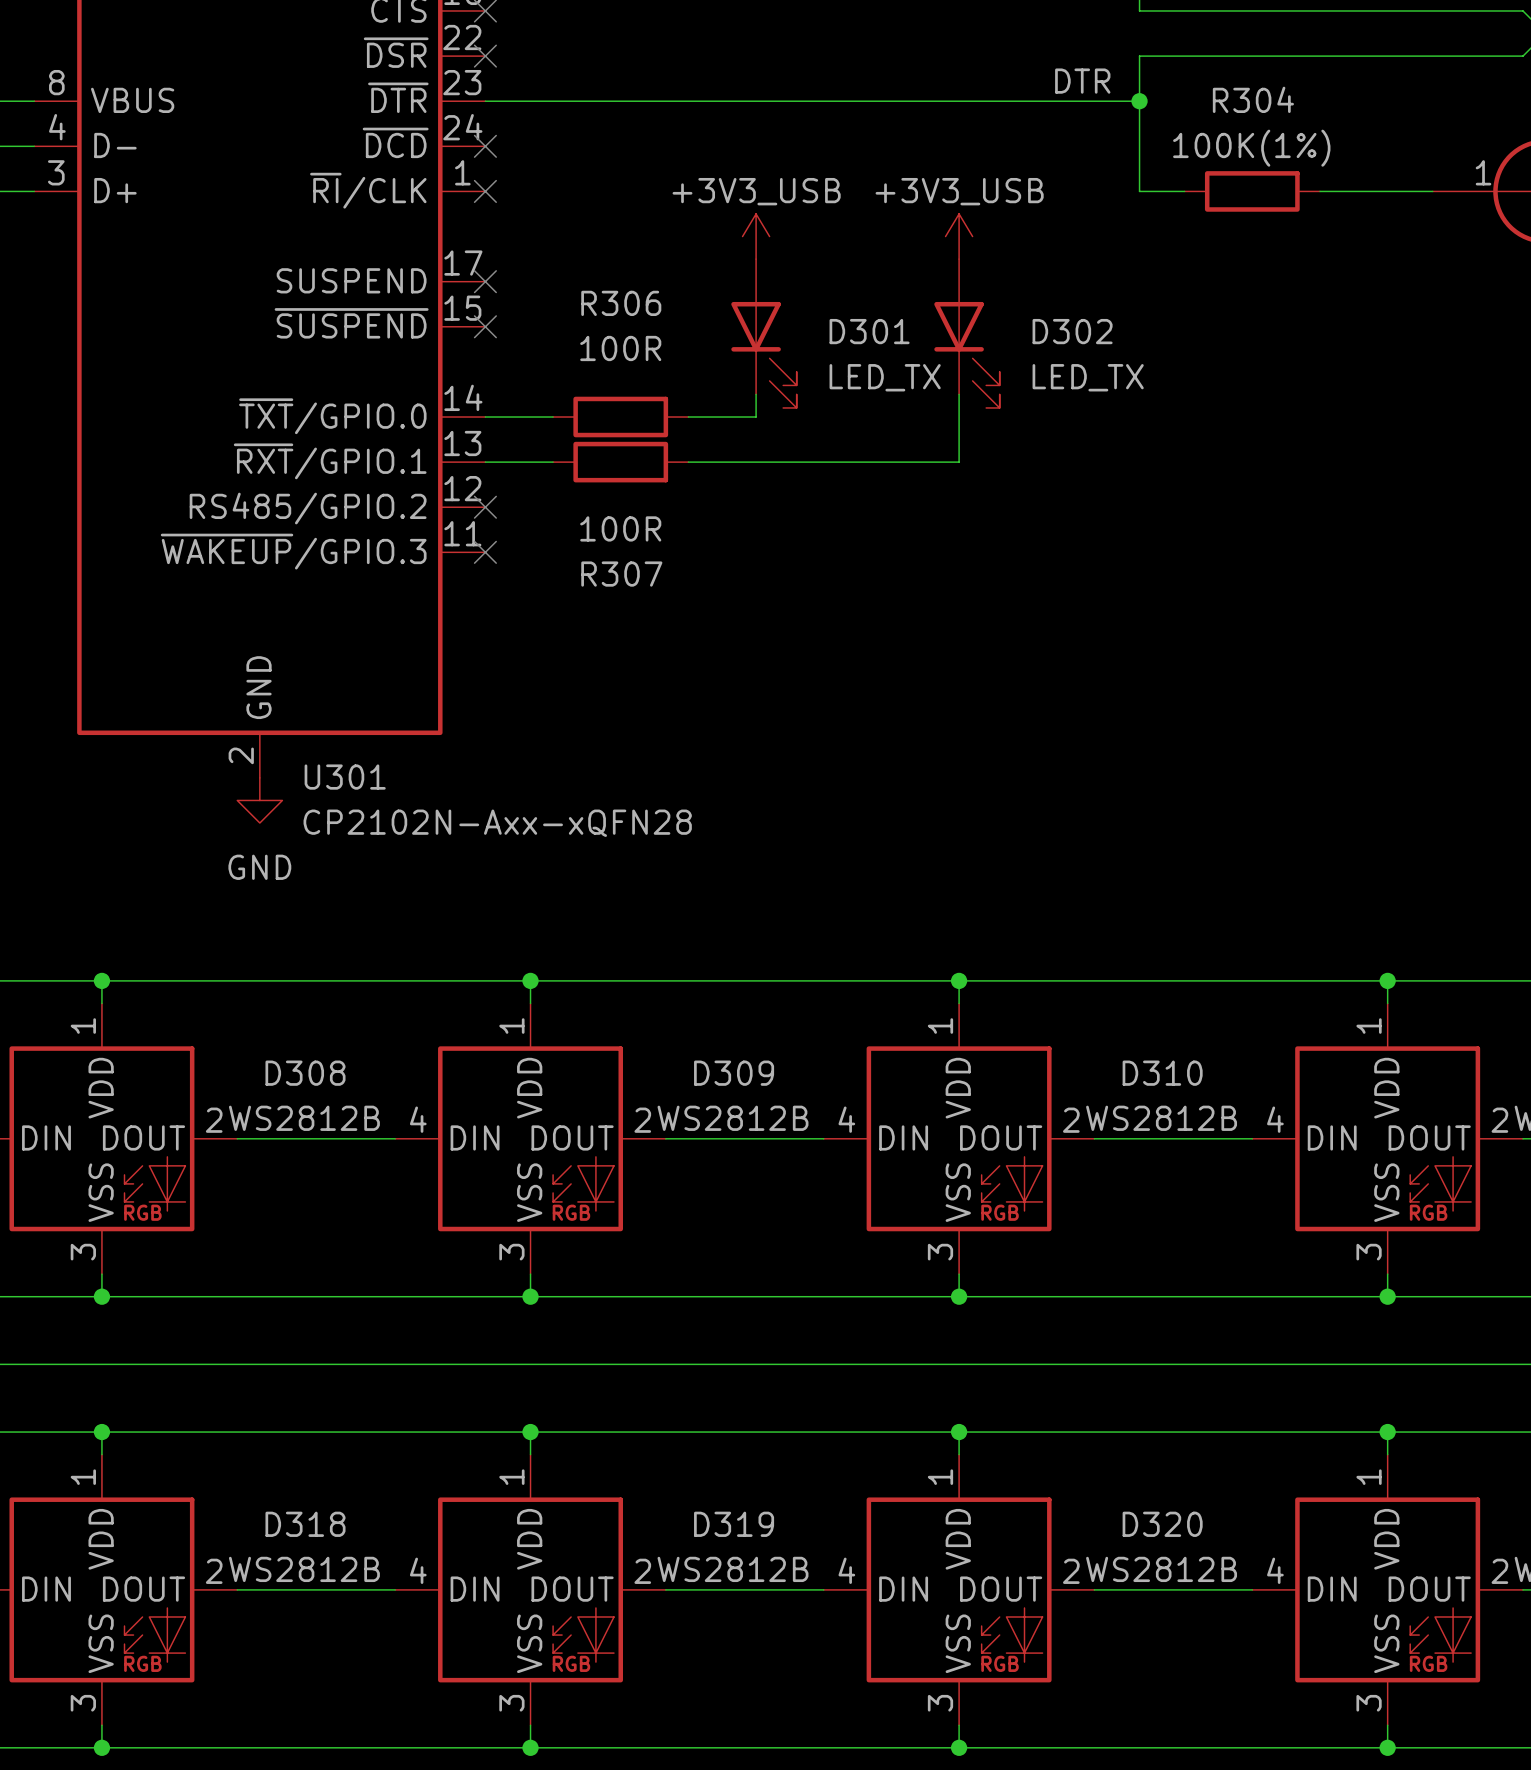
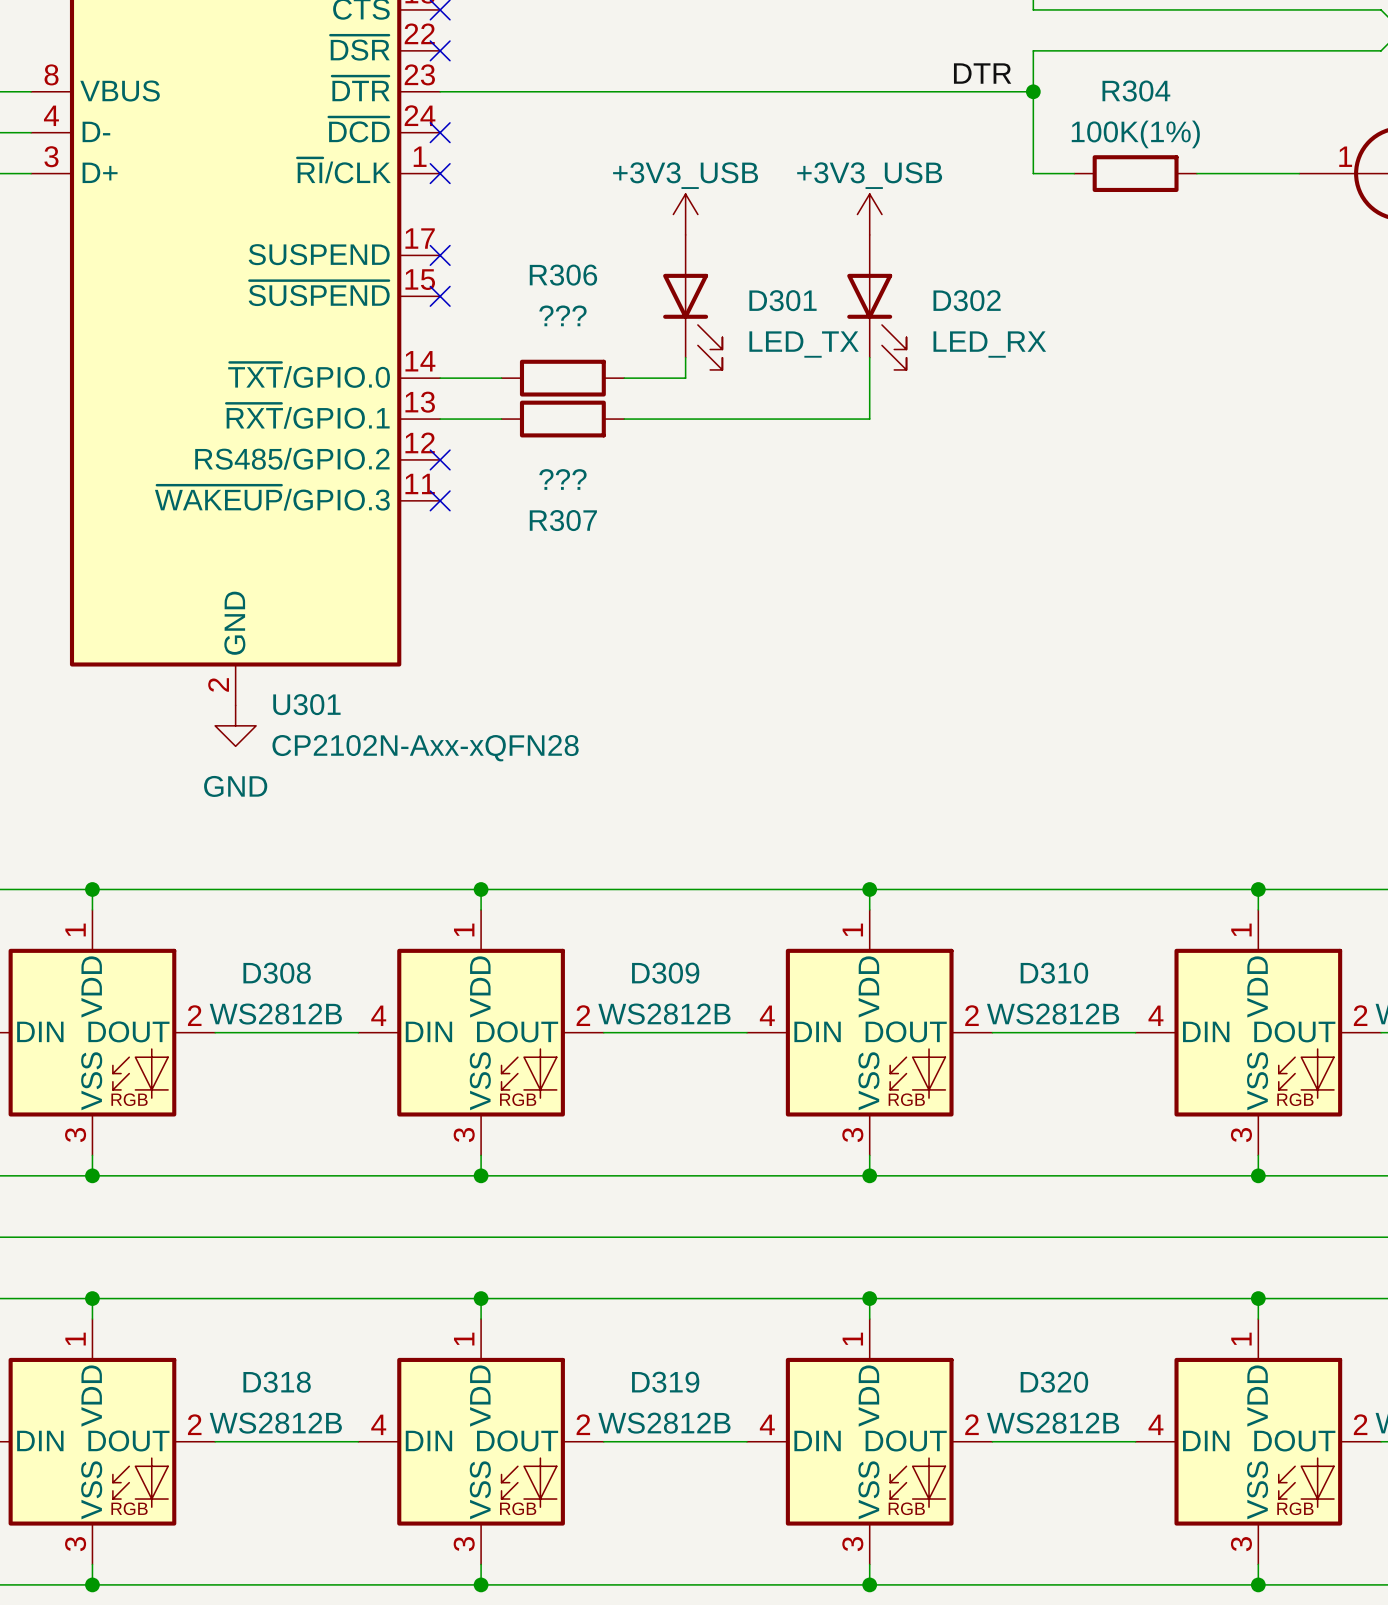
R306 value: 100R (620, 348) -> ??? (562, 315)
D302 value: LED_TX (1088, 377) -> LED_RX (989, 344)
R307 value: 100R (620, 528) -> ??? (562, 479)

